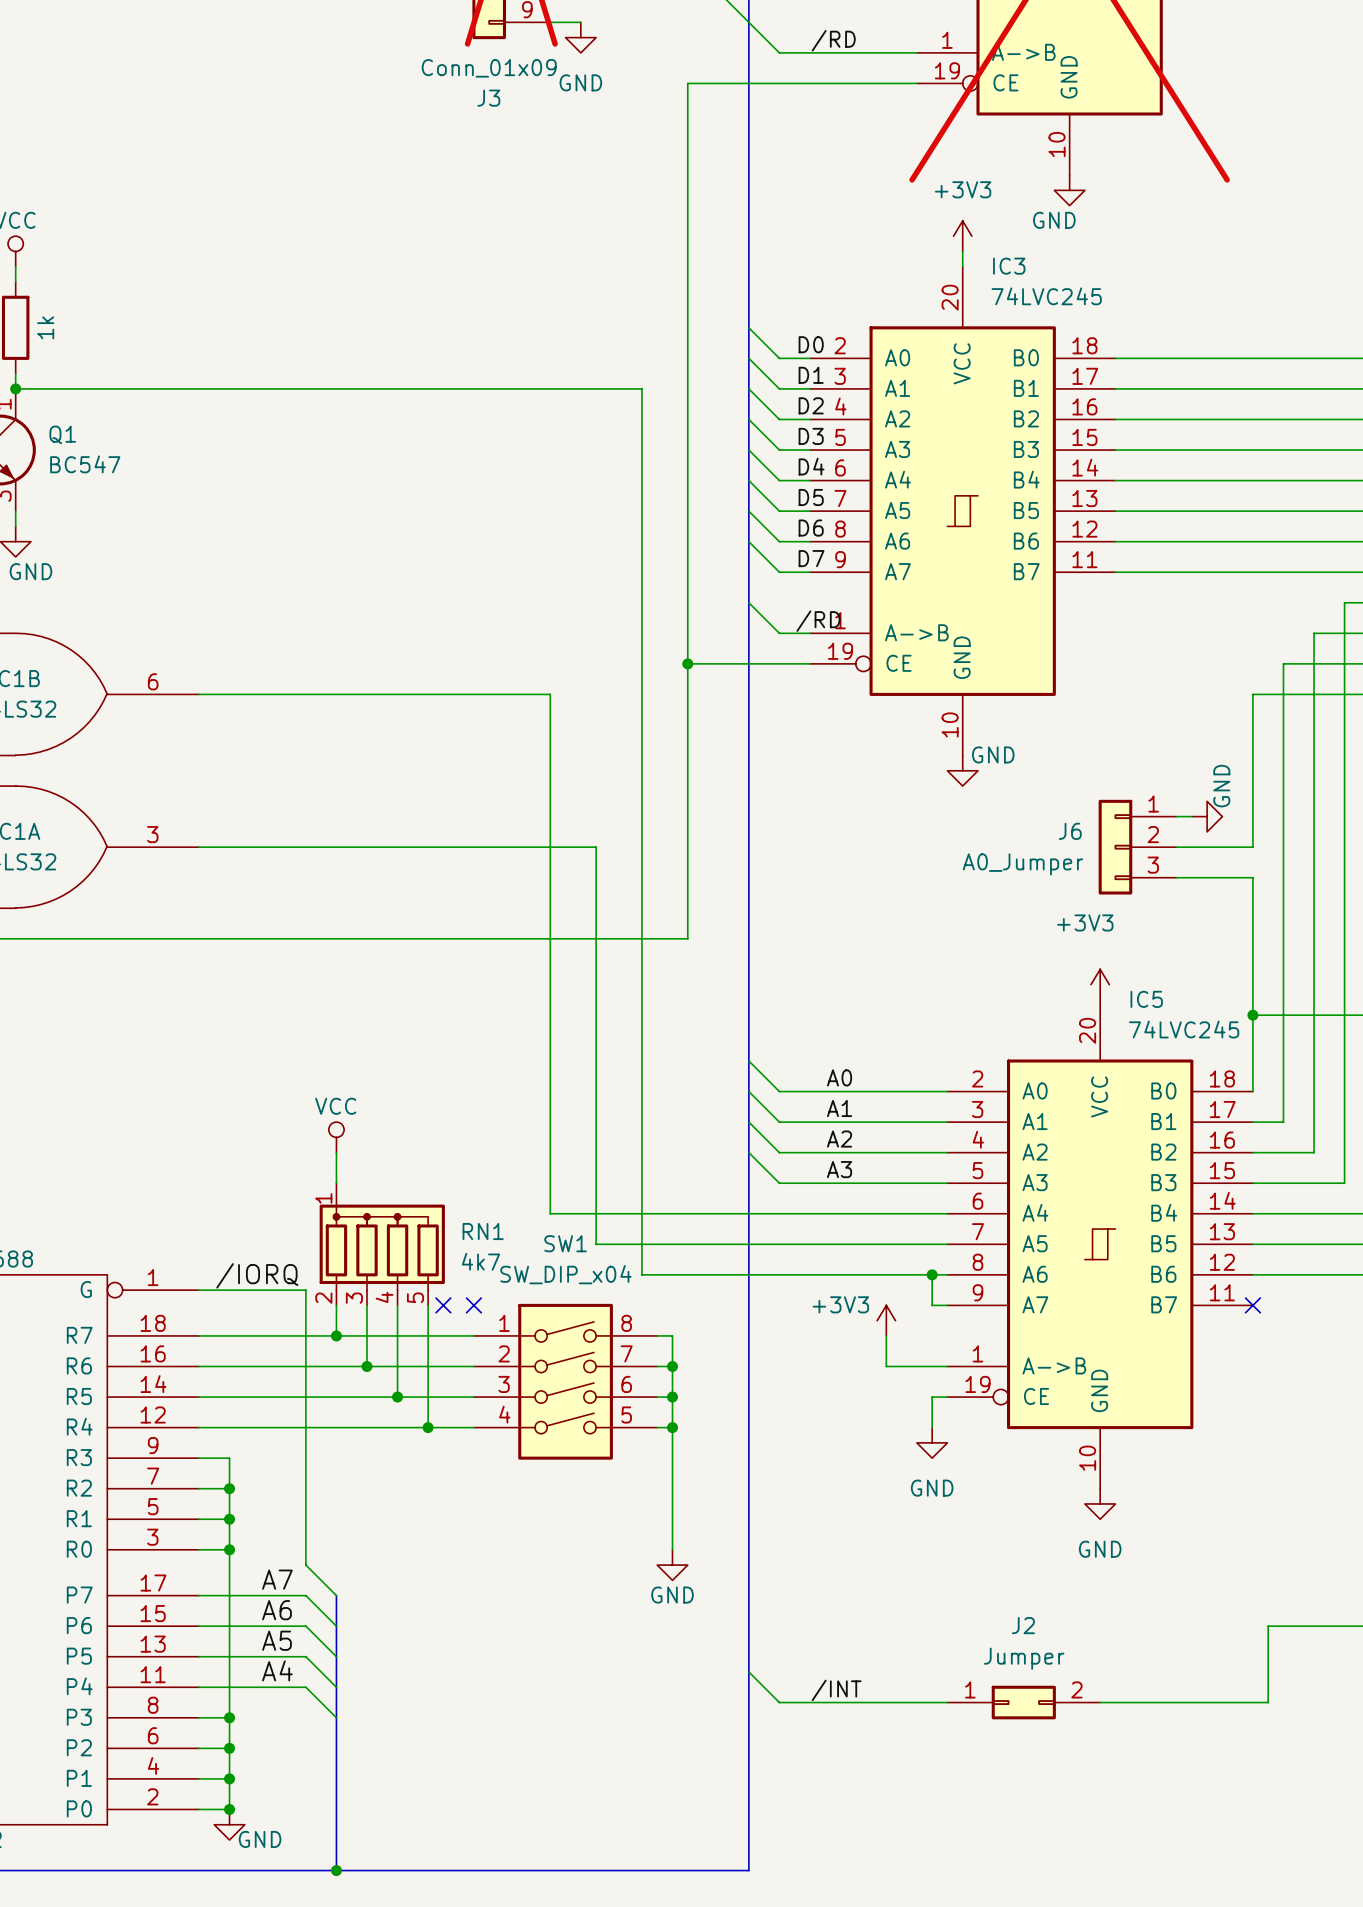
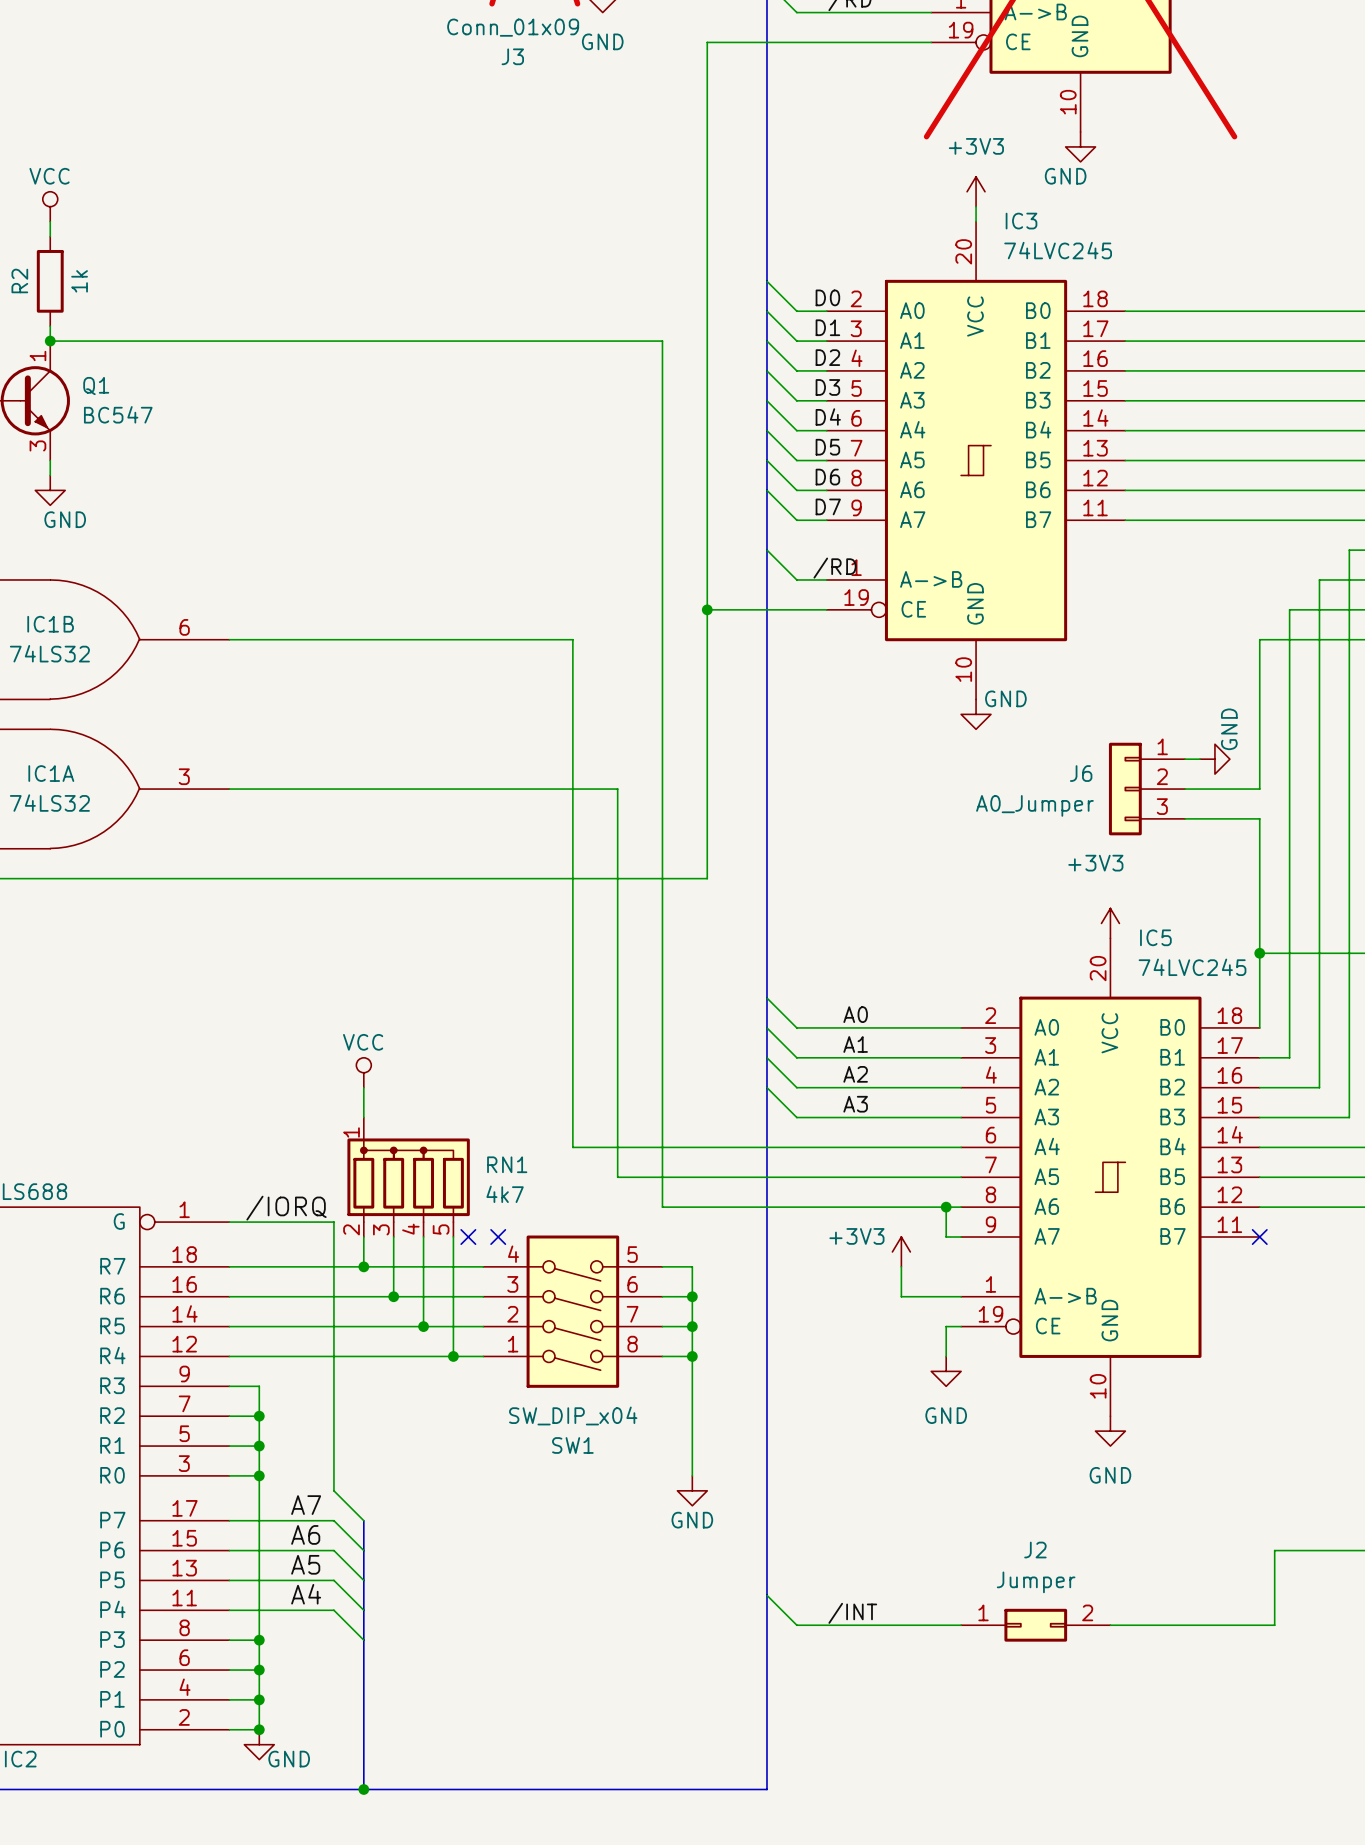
SW1 flip: as is (565, 1381) -> up-down (572, 1311)

